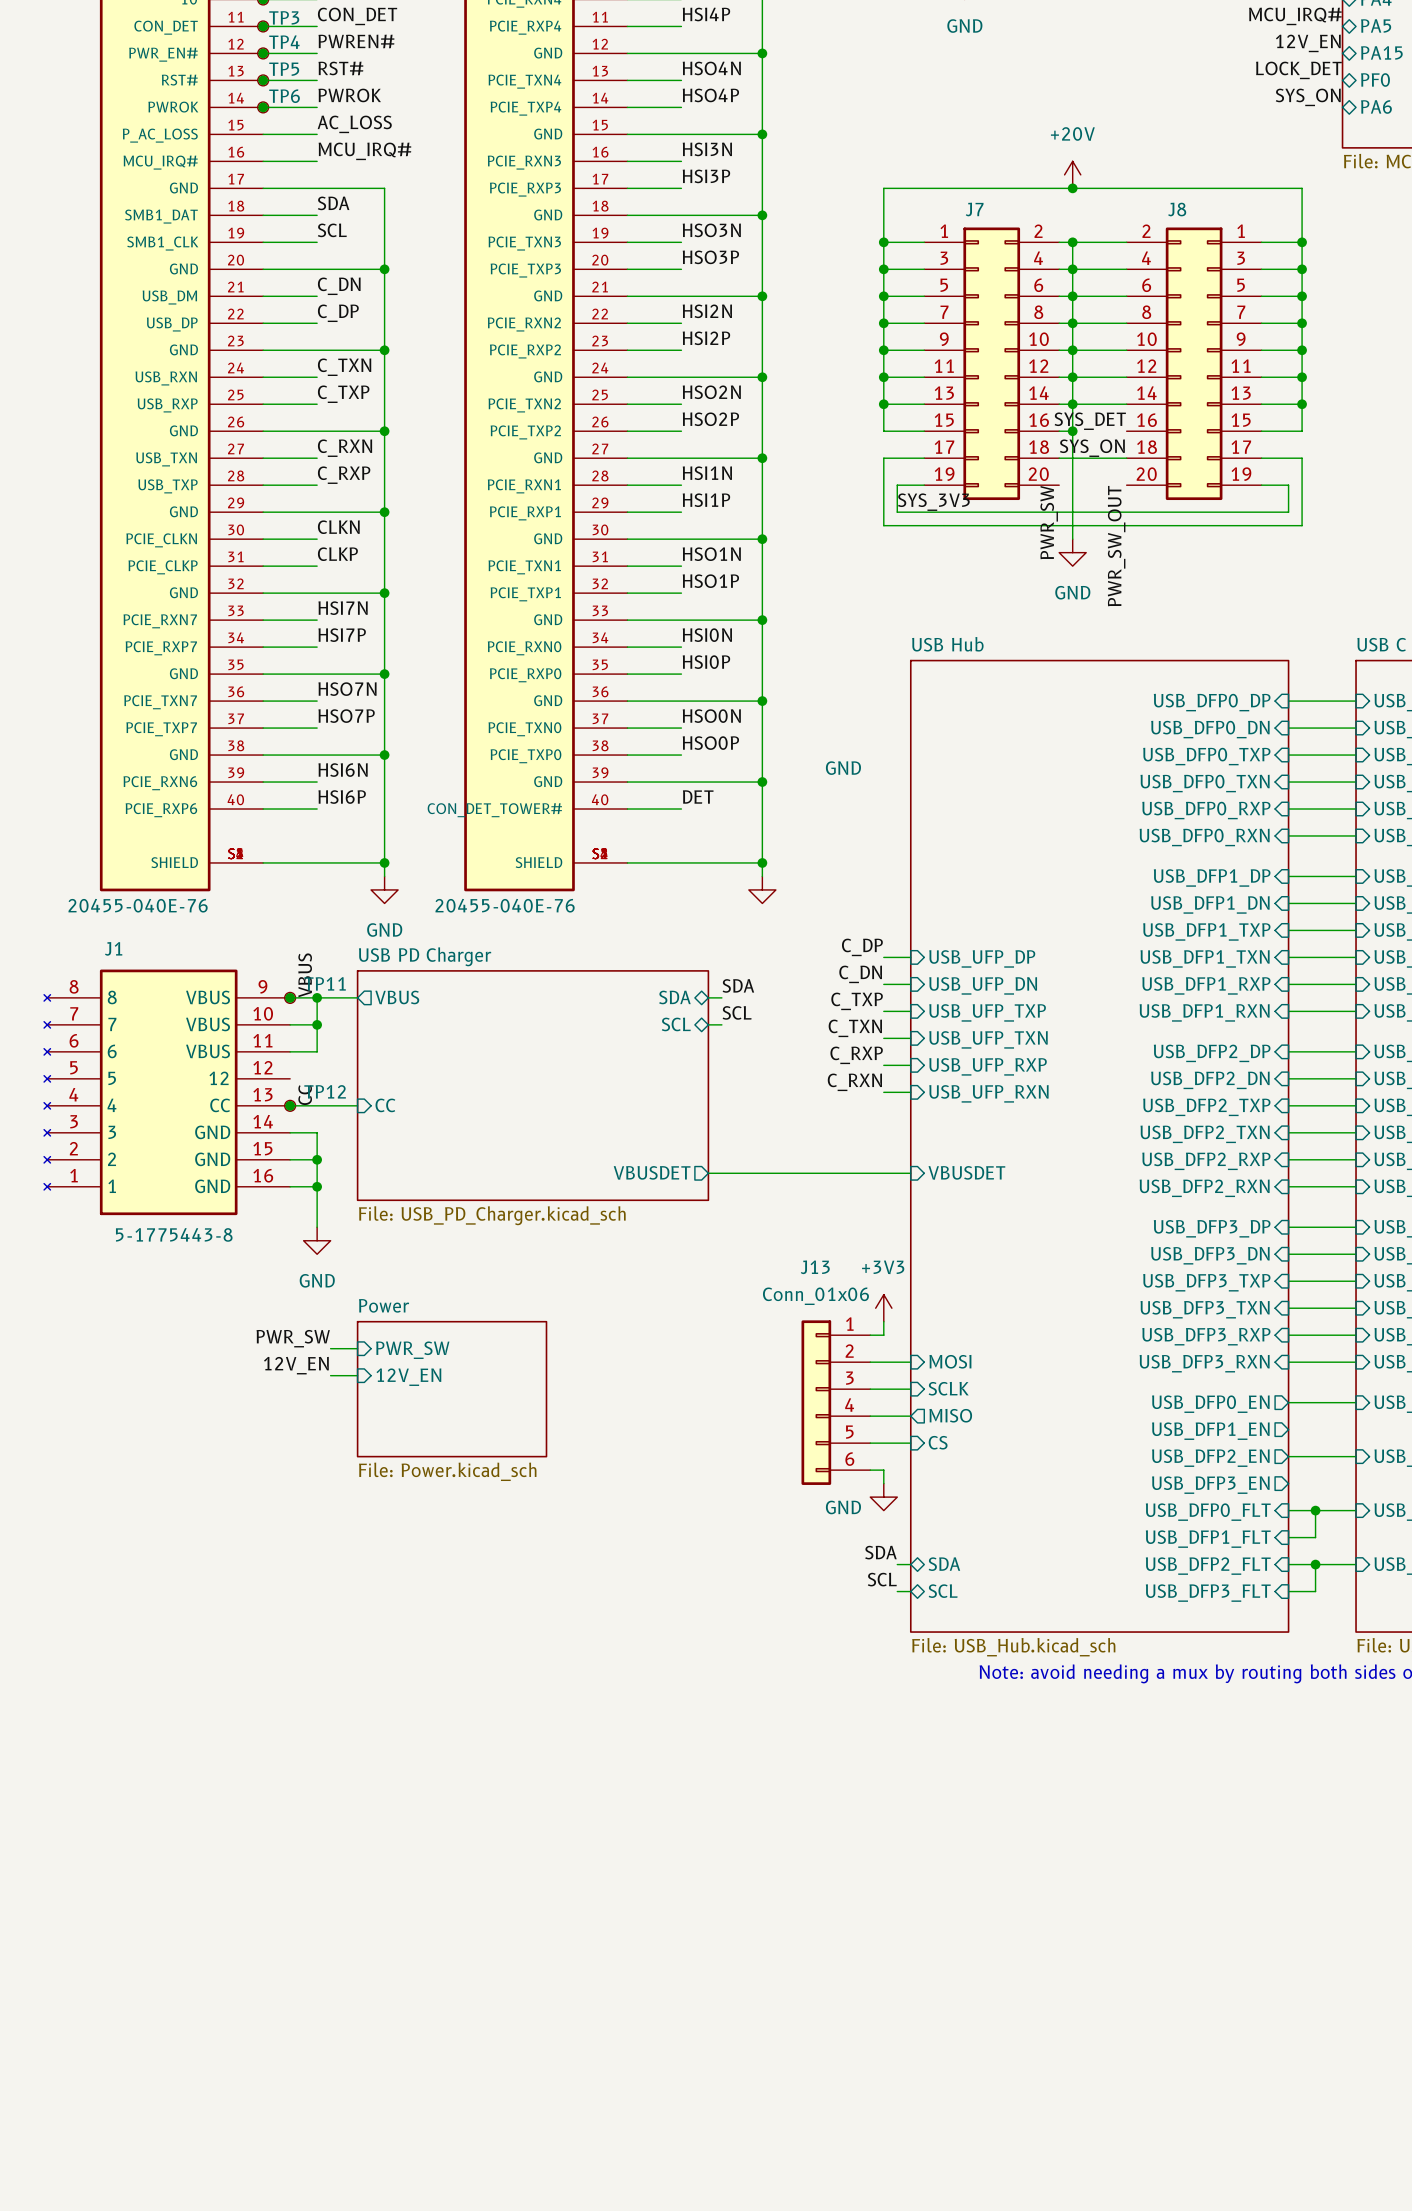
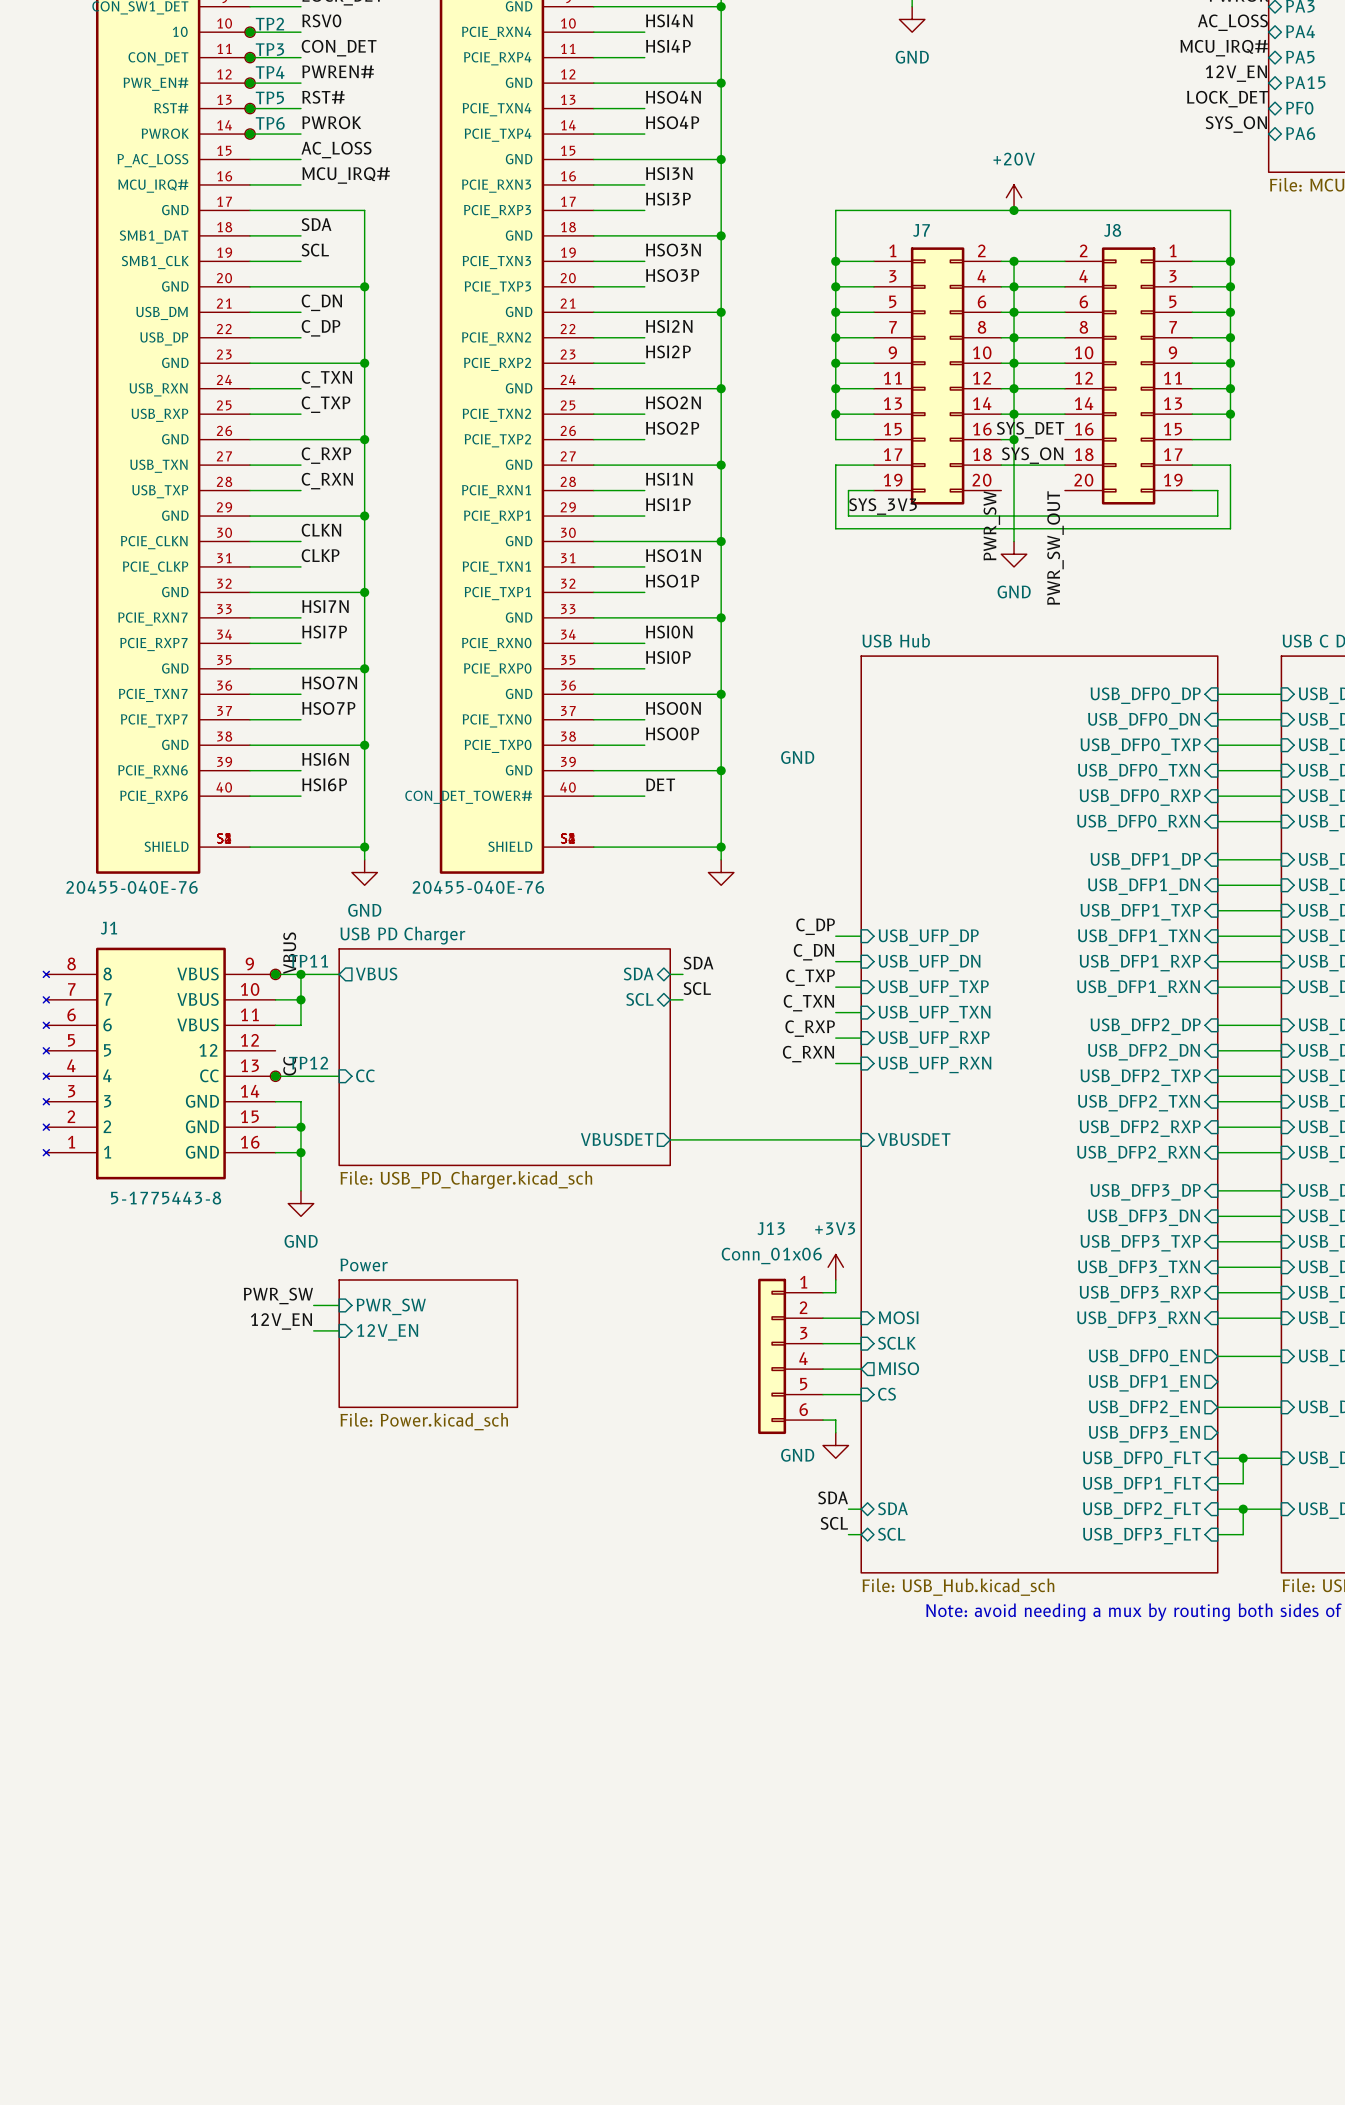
label: C_RXN (345, 448) -> C_RXP (326, 455)
label: C_RXP (344, 475) -> C_RXN (327, 481)

